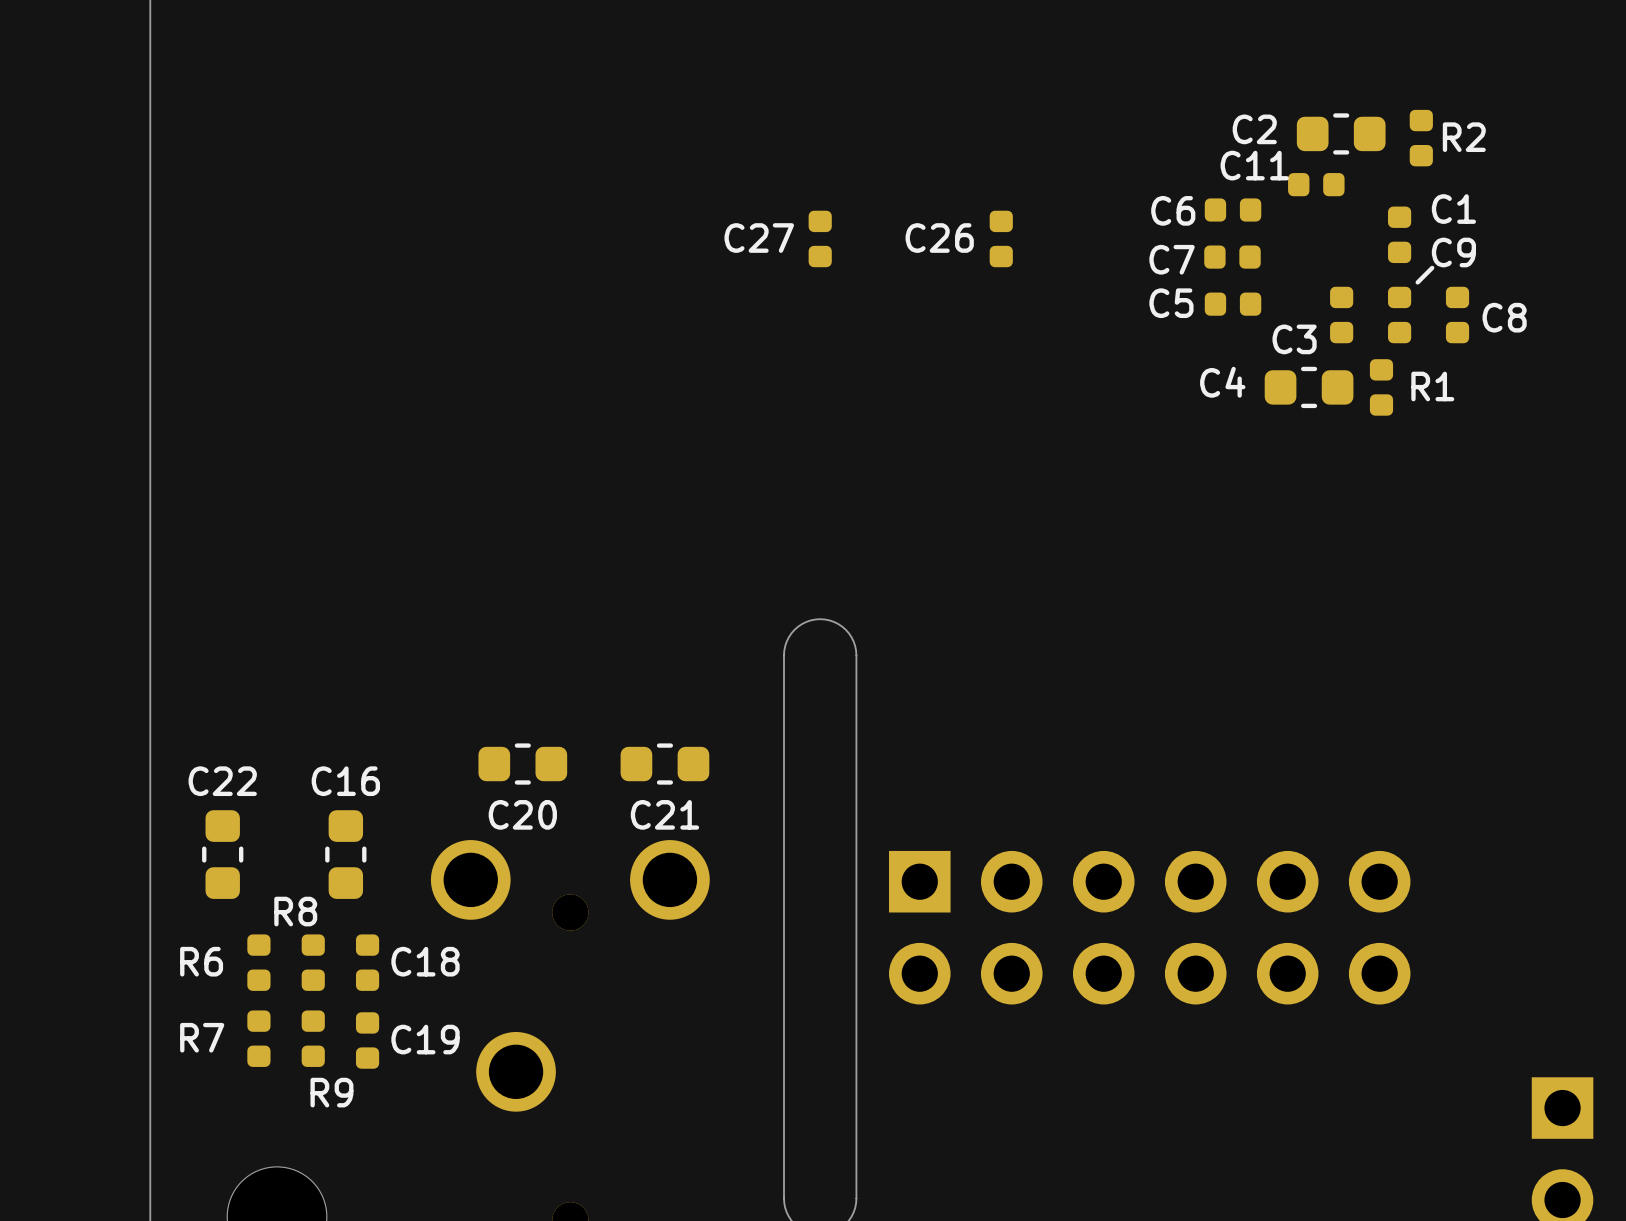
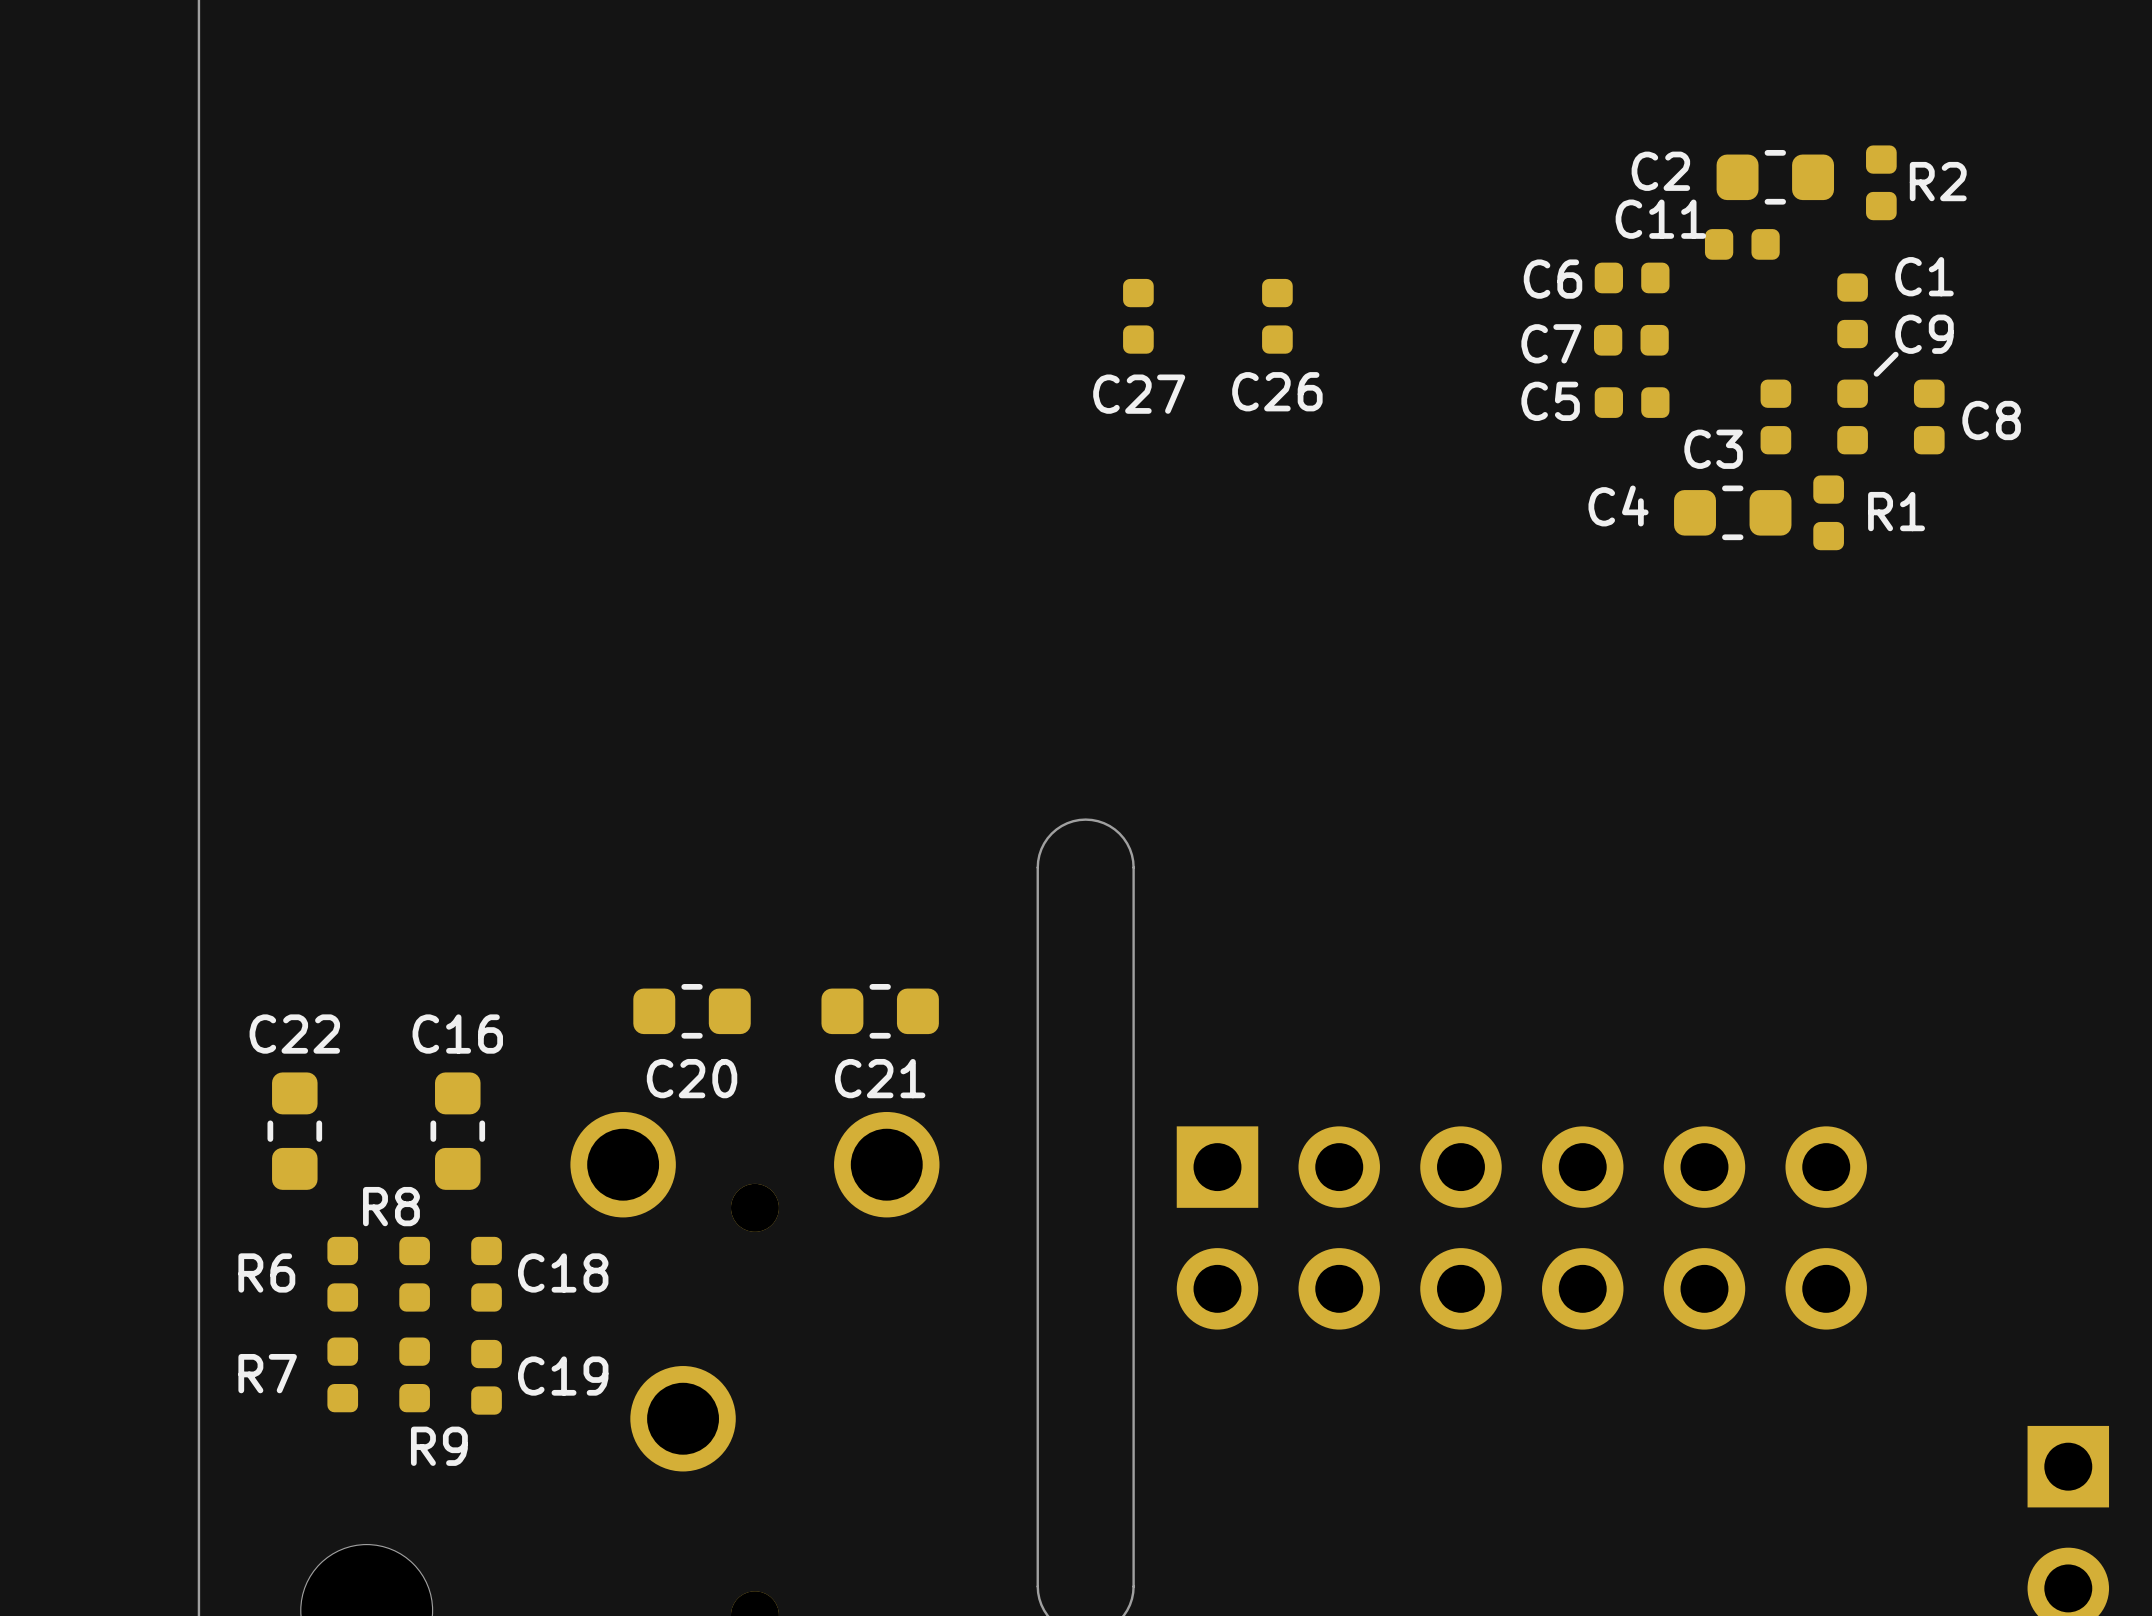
C27 name position: C27 (759, 238) -> C27 (1139, 394)
C27 position: (820, 238) -> (1138, 316)
C26 name position: C26 (939, 238) -> C26 (1277, 391)
C26 position: (1001, 238) -> (1277, 316)

